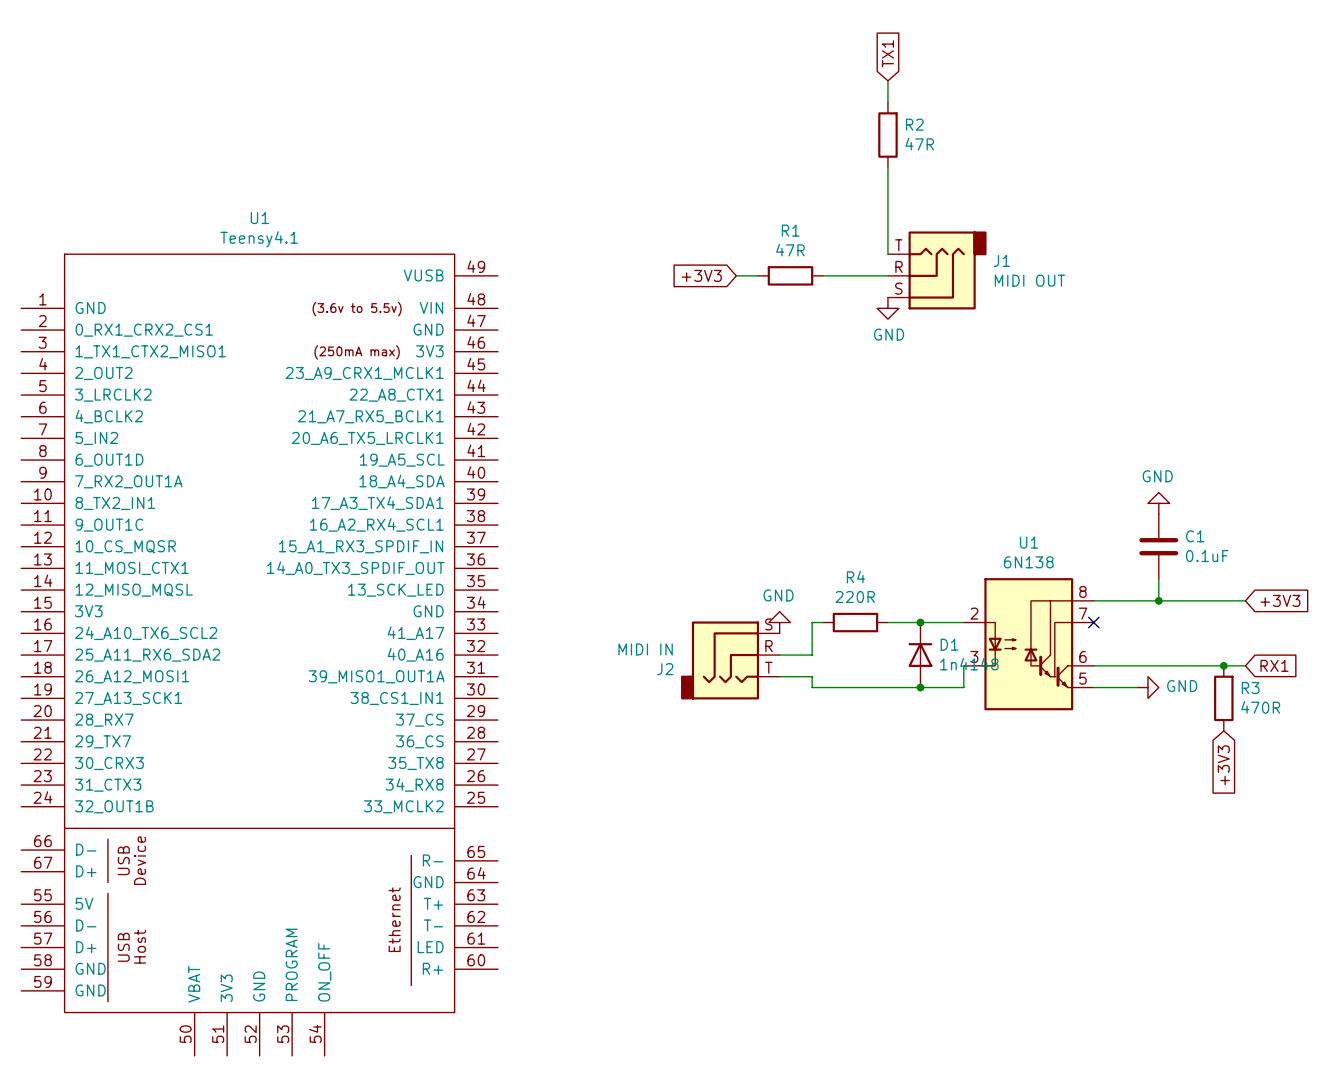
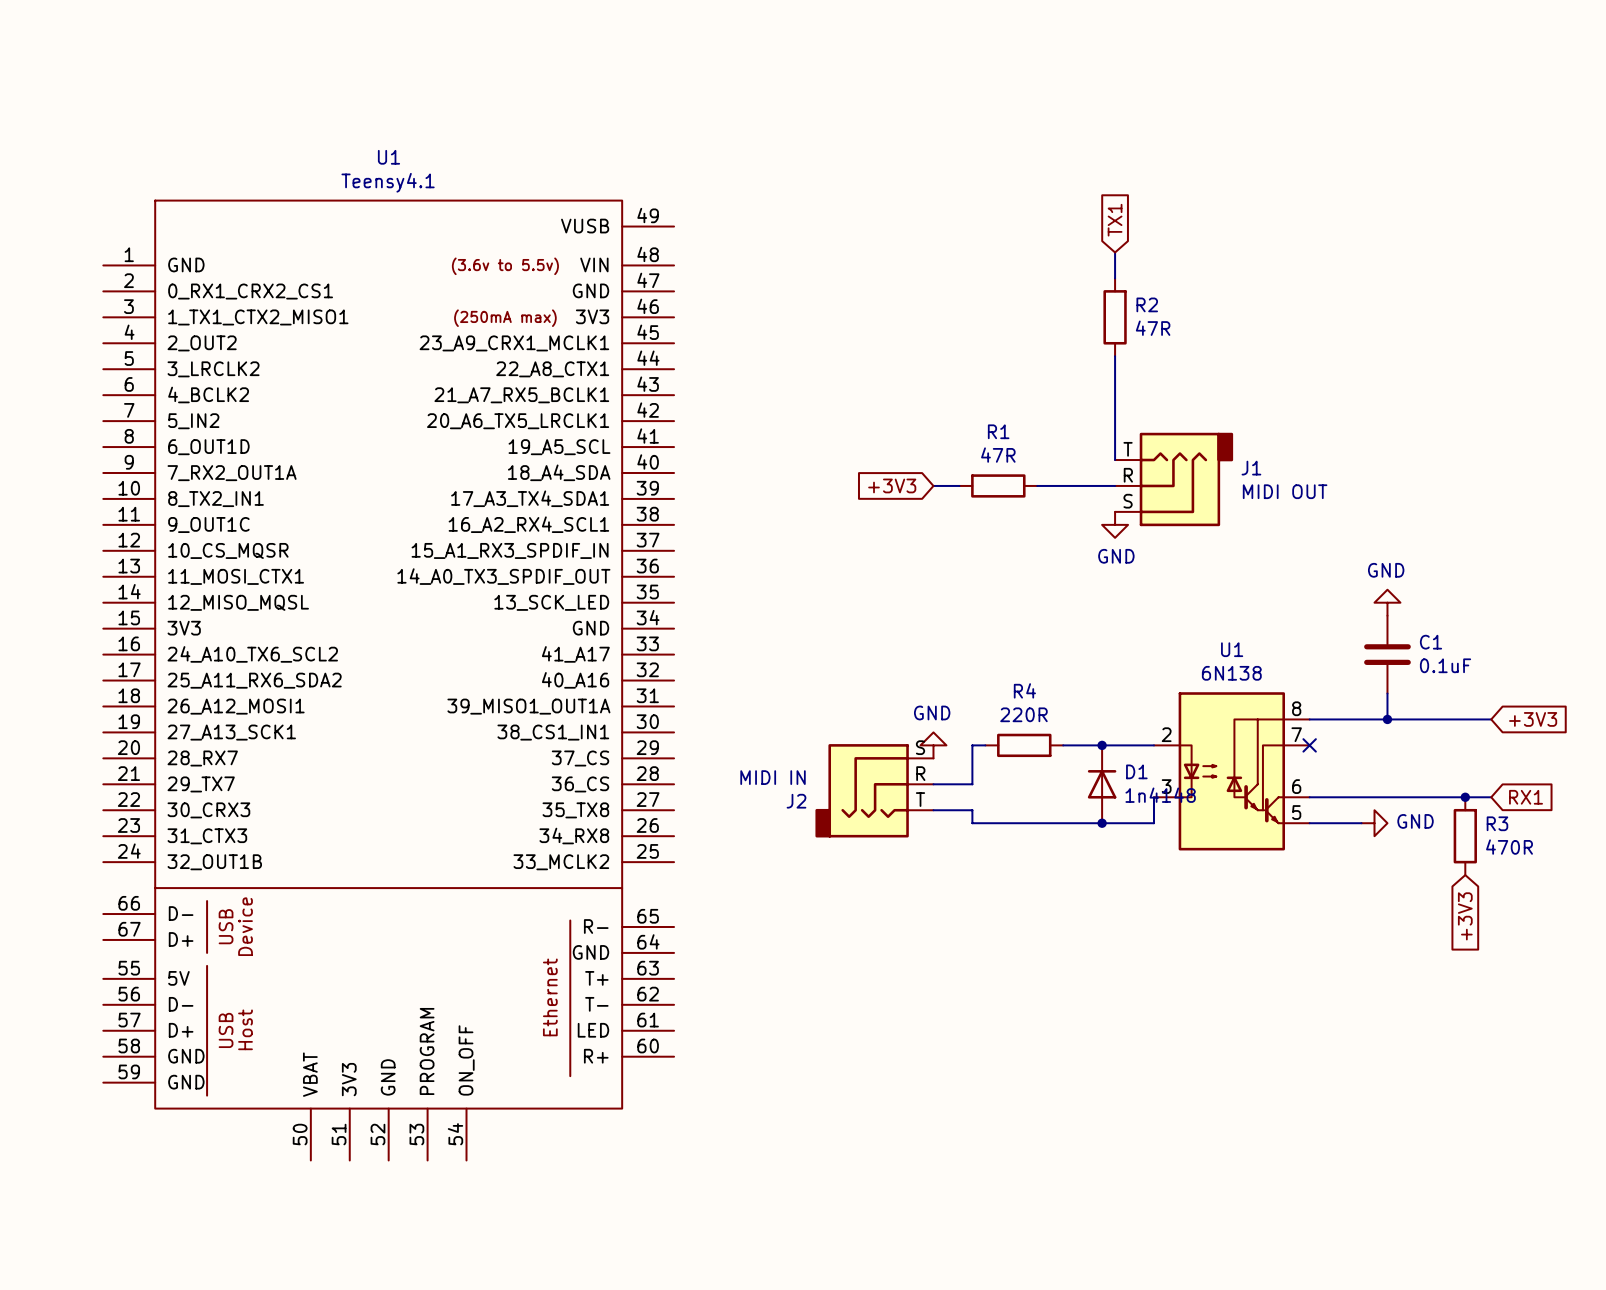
global label position: TX1 (887, 53) -> TX1 (1115, 220)
wire: (887, 80) (887, 102) -> (1115, 252) (1115, 278)
R2 position: (887, 135) -> (1115, 317)
wire: (887, 167) (887, 254) -> (1115, 356) (1115, 460)
J1 position: (937, 270) -> (1174, 479)
global label position: +3V3 (701, 275) -> +3V3 (892, 485)
wire: (736, 275) (757, 275) -> (933, 485) (959, 485)
R1 position: (790, 275) -> (998, 485)
wire: (822, 275) (887, 275) -> (1037, 485) (1115, 485)
power symbol position: GND (887, 308) -> GND (1115, 524)
U1 position: (259, 655) -> (388, 680)

